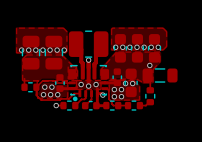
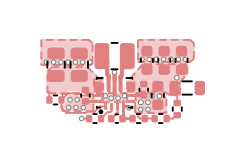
via: none -> (105, 95)
via: none -> (124, 95)
via: (81, 84) -> none
via: (96, 84) -> none
via: none -> (111, 98)
via: none -> (118, 98)
via: (88, 86) -> none

